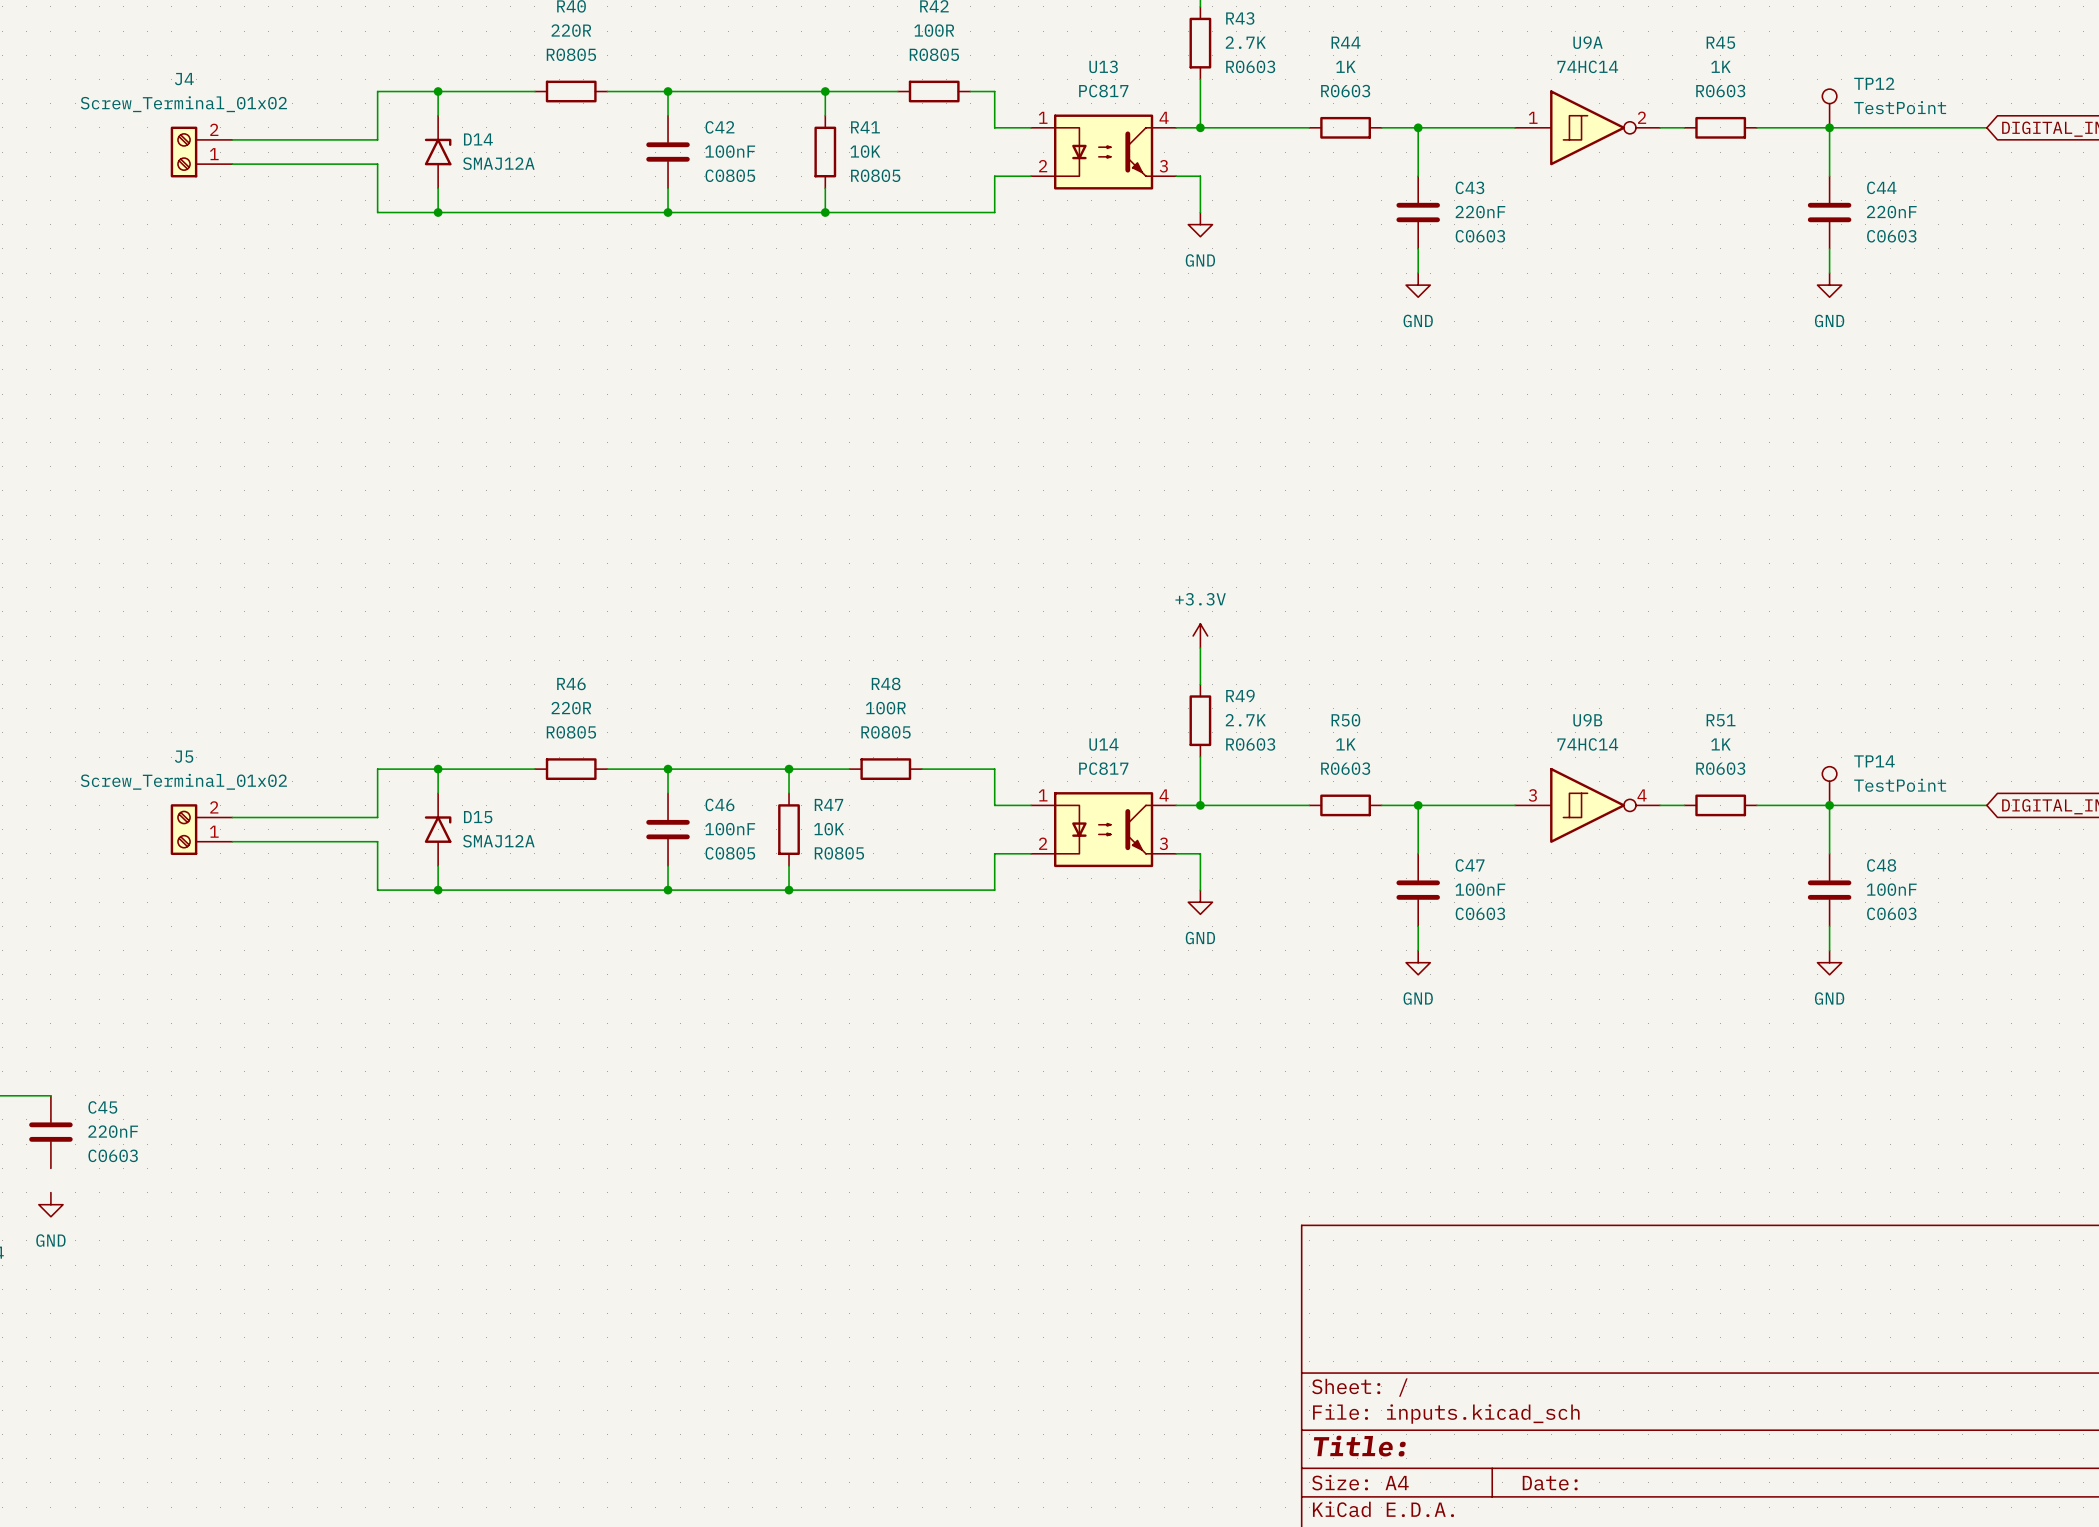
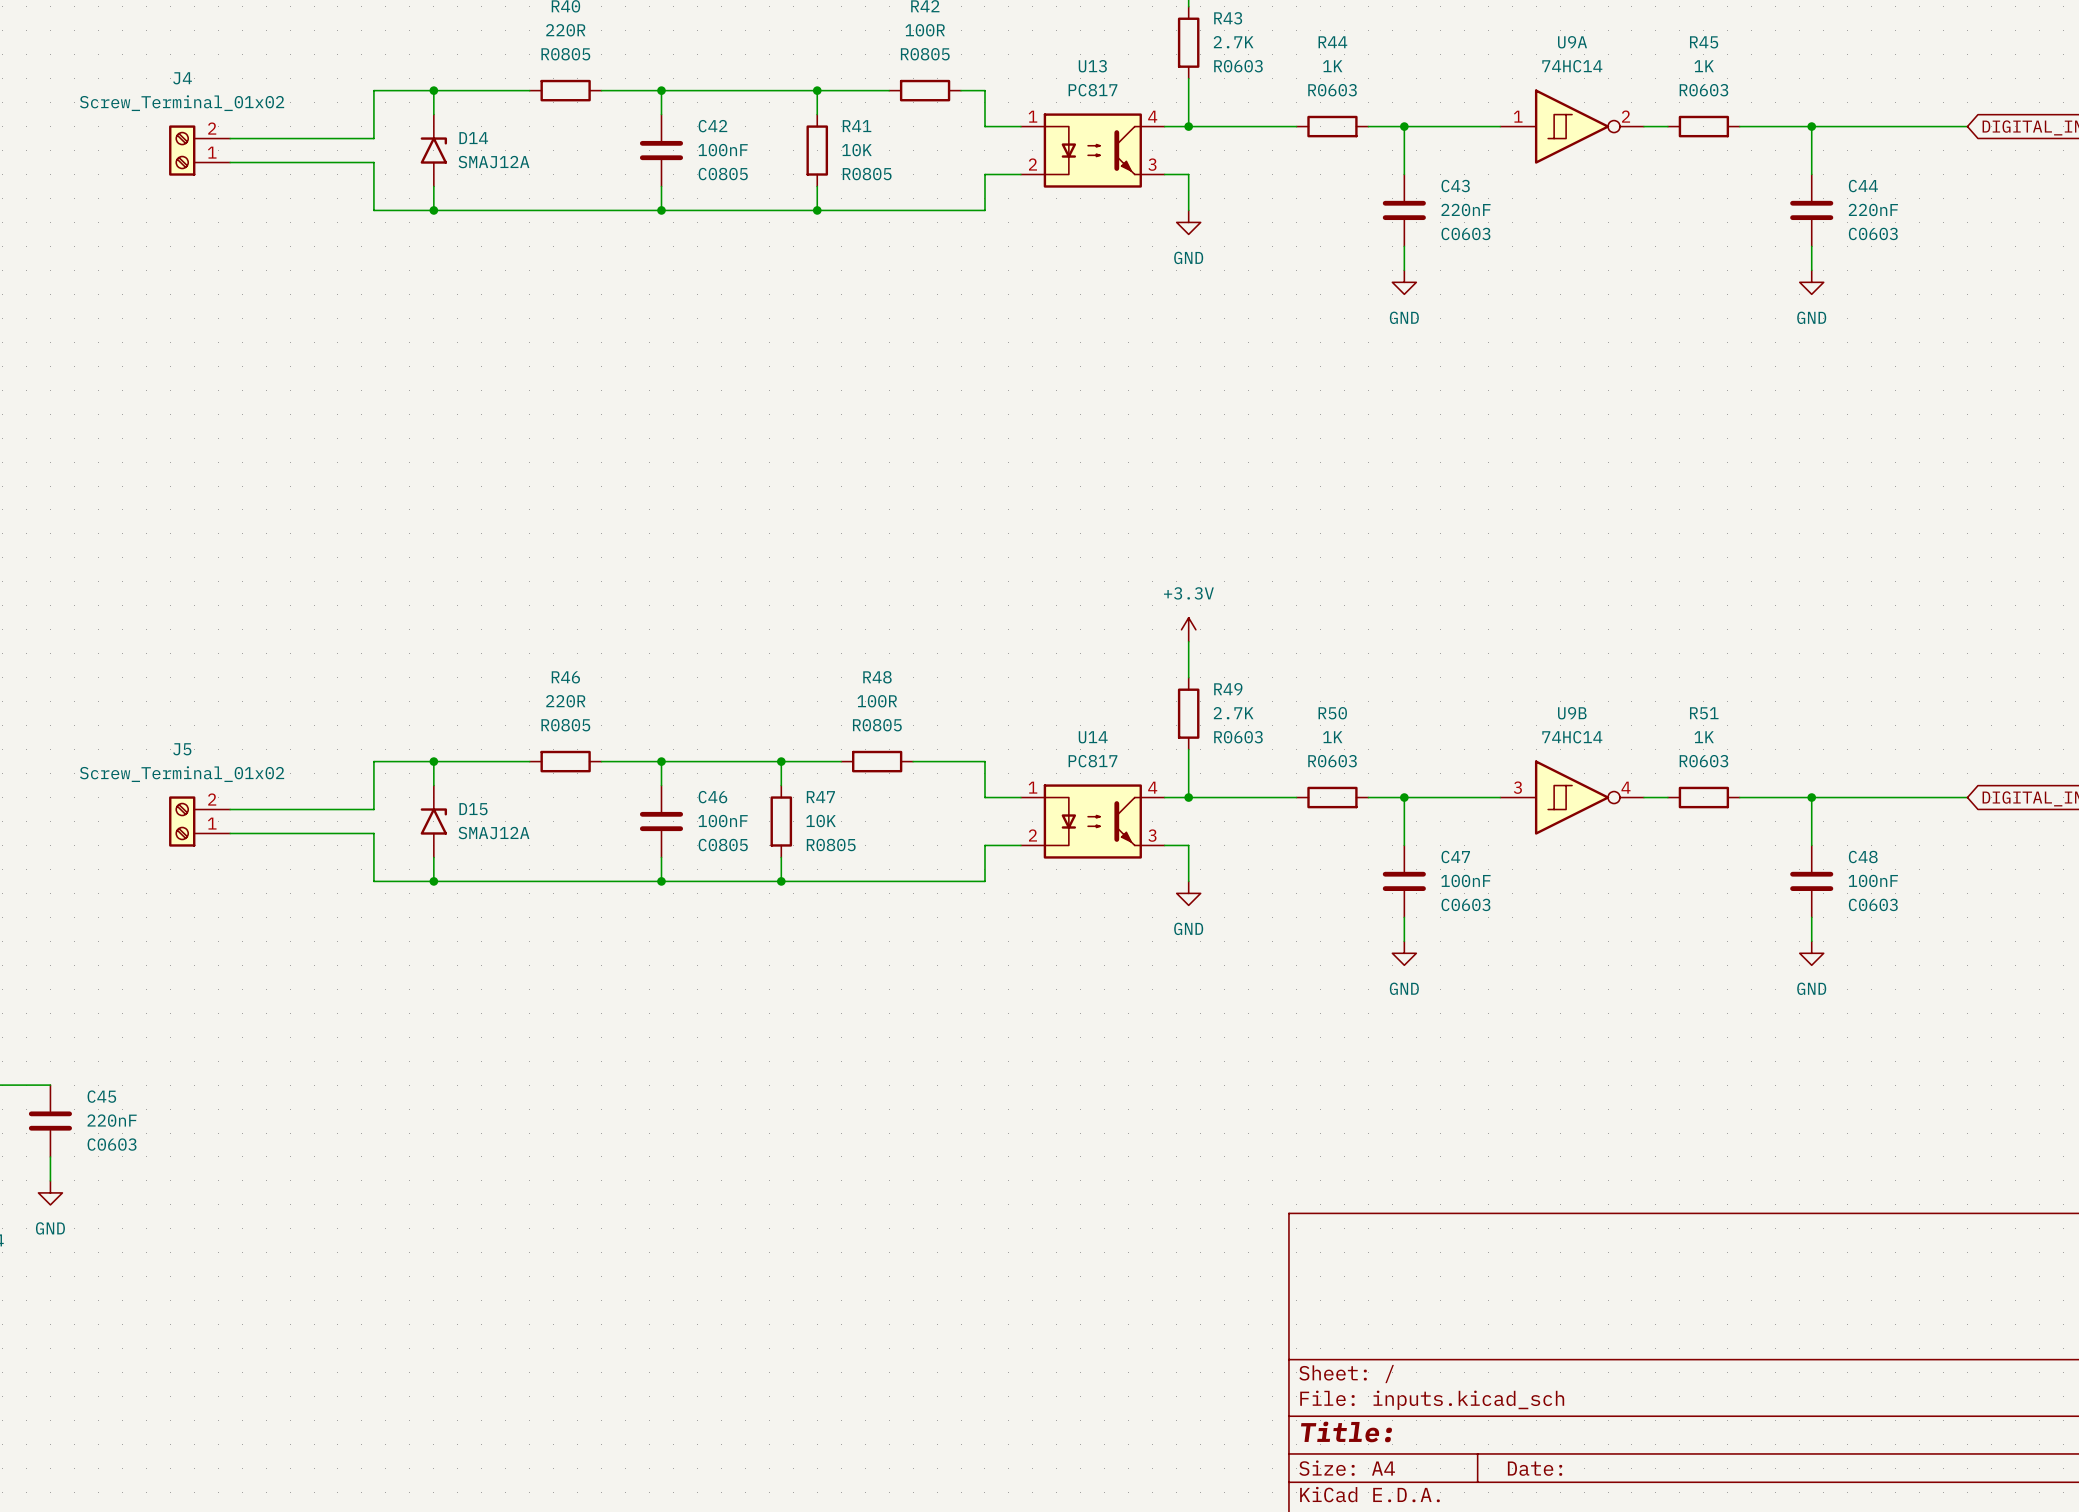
TP12: TestPoint (1829, 108) -> none
TP14: TestPoint (1829, 786) -> none
wire: none -> (50, 1156) (50, 1180)

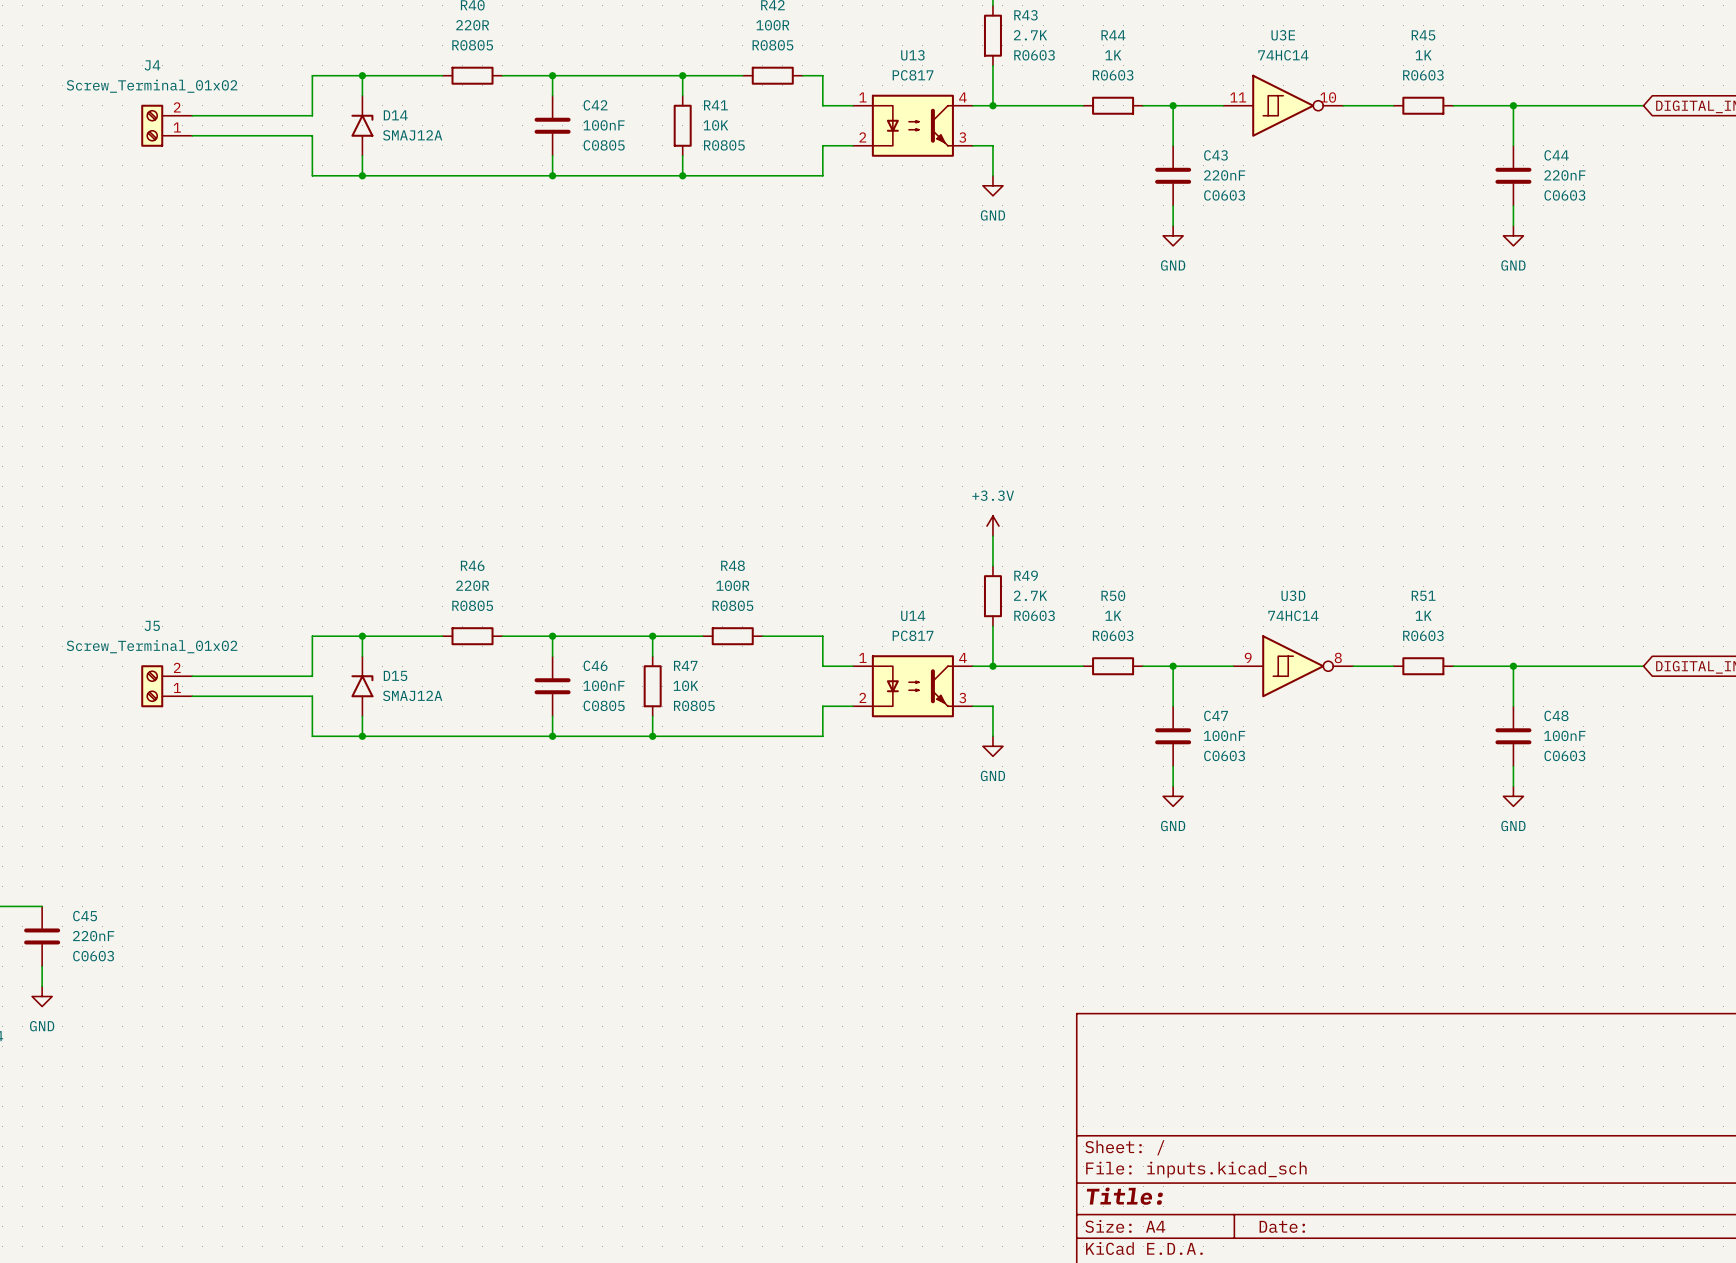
U3E: none -> 74HC14 (1283, 105)
U9A: 74HC14 (1572, 126) -> none
U3D: none -> 74HC14 (1293, 666)
U9B: 74HC14 (1572, 797) -> none

